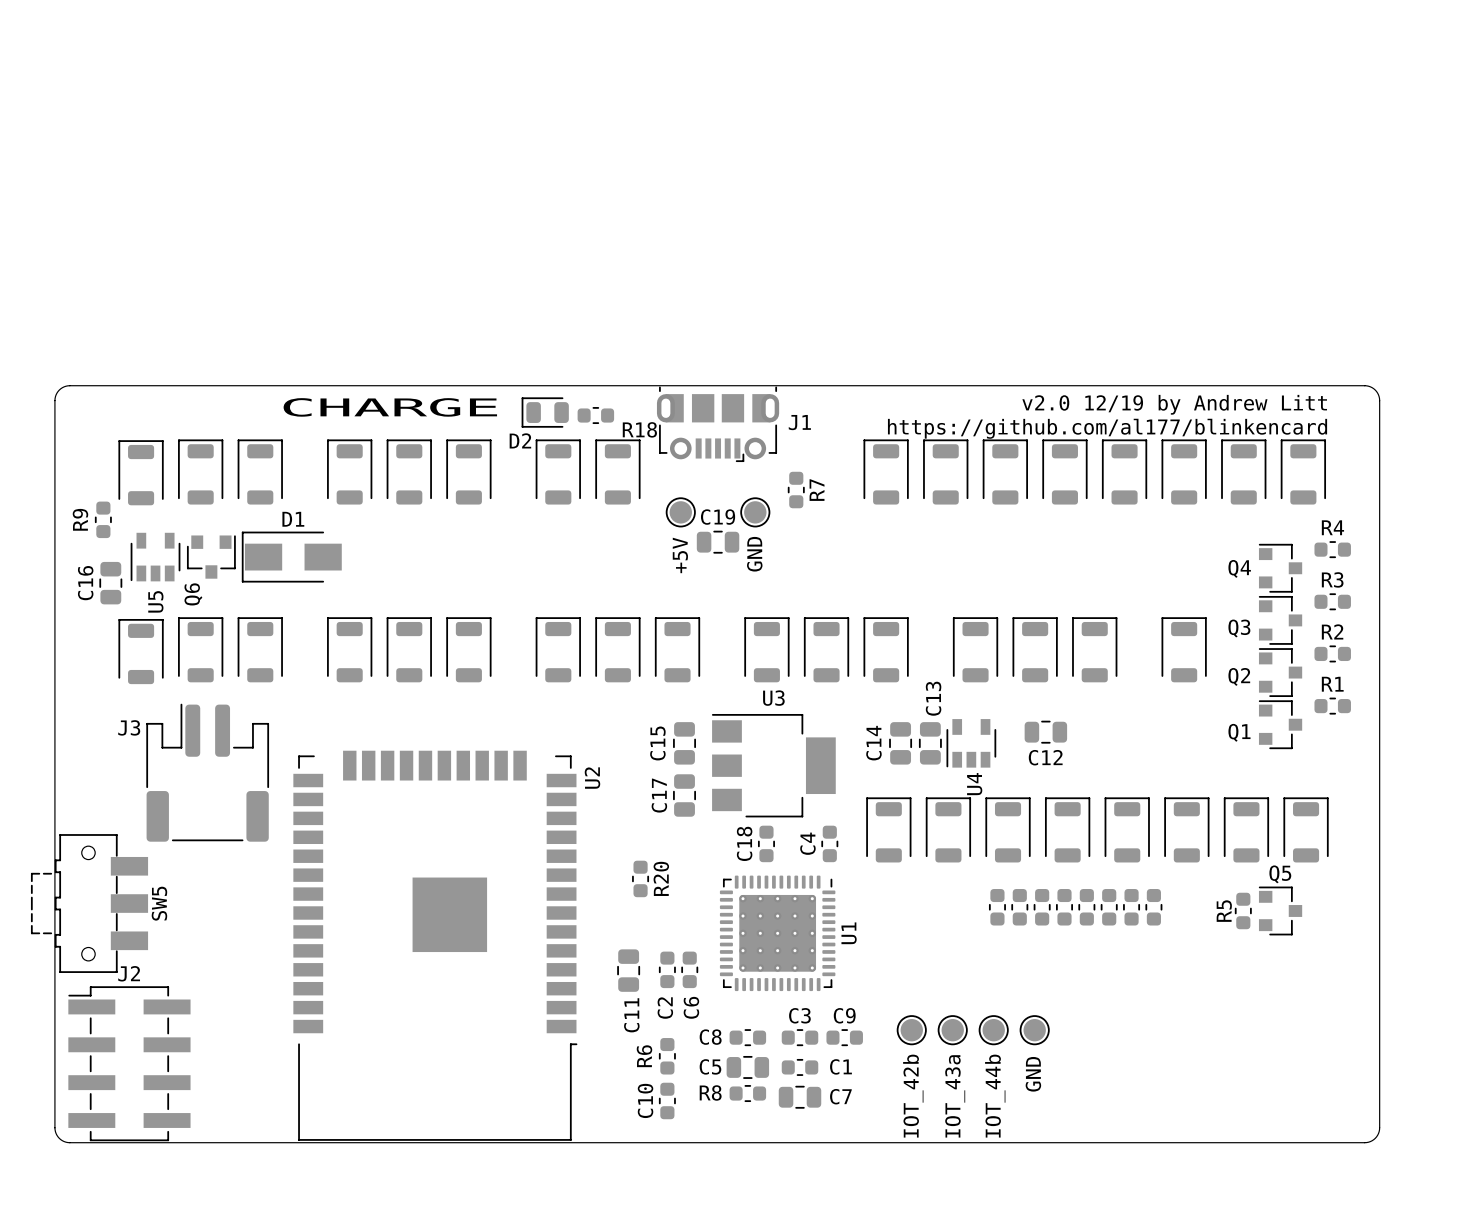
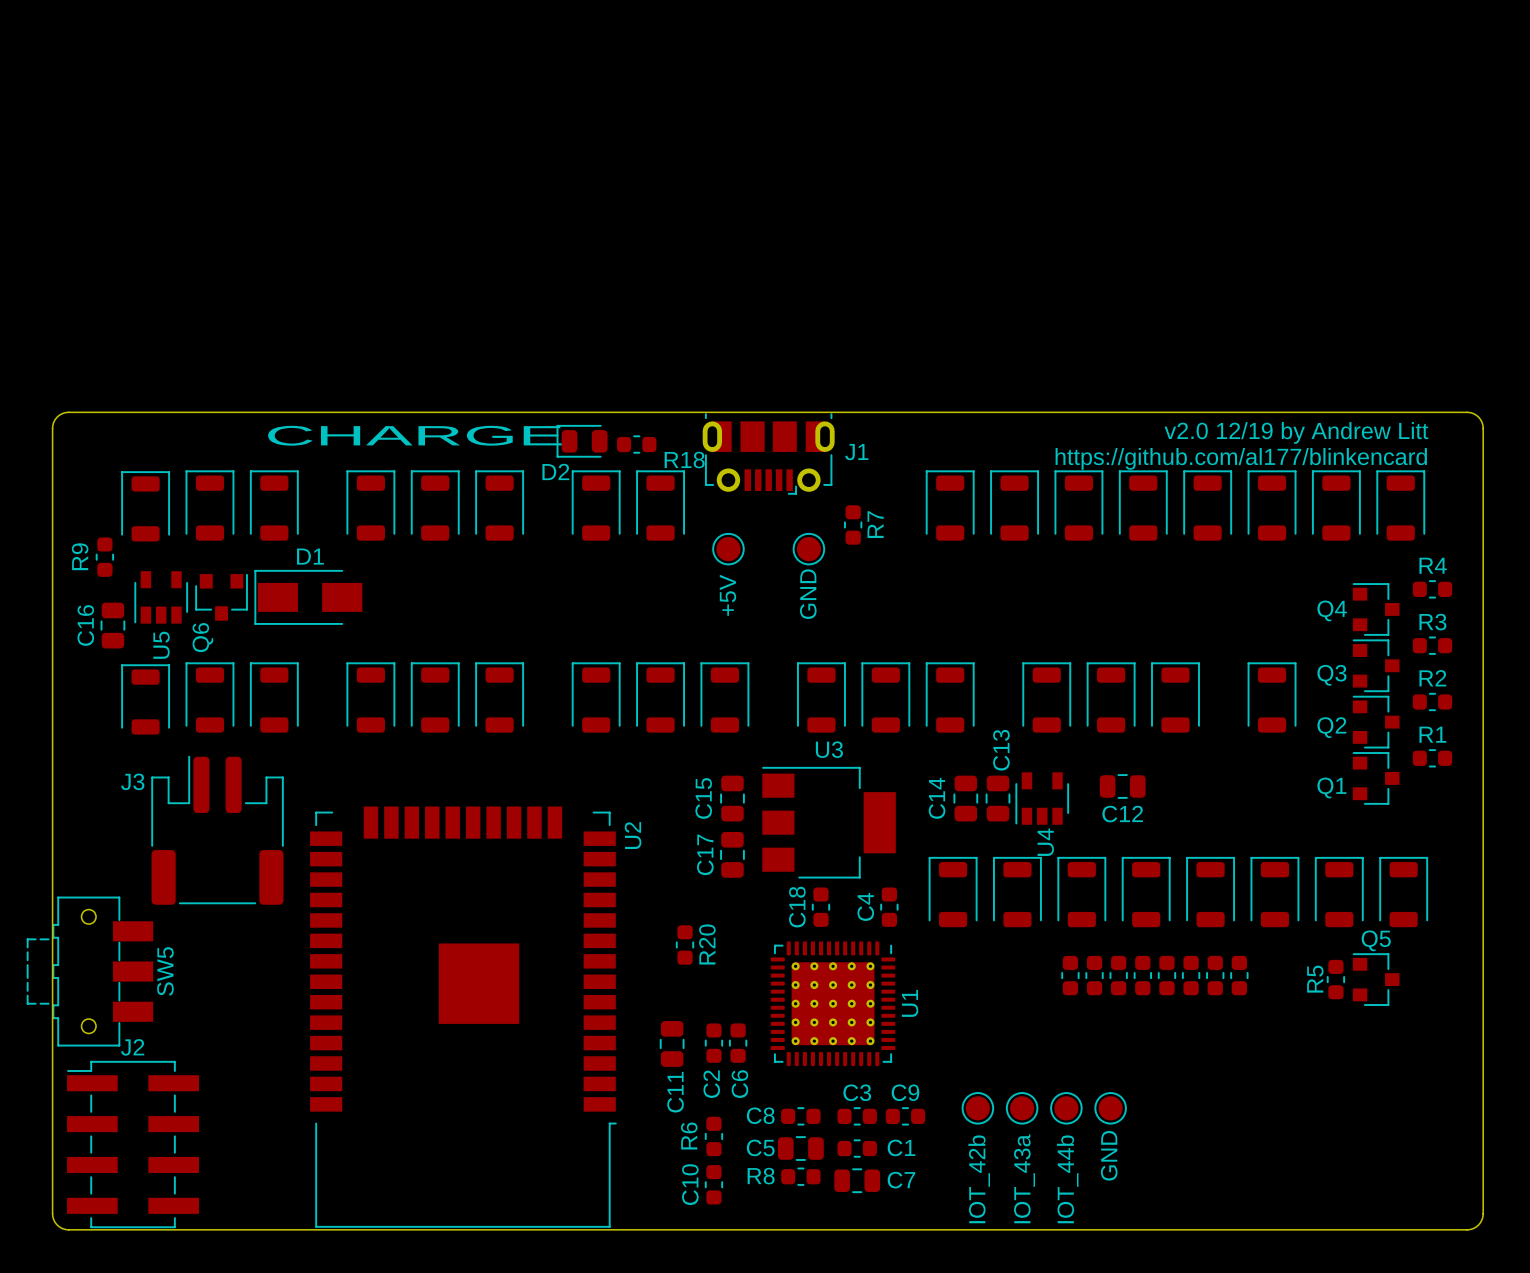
C19: (718, 542) -> none

